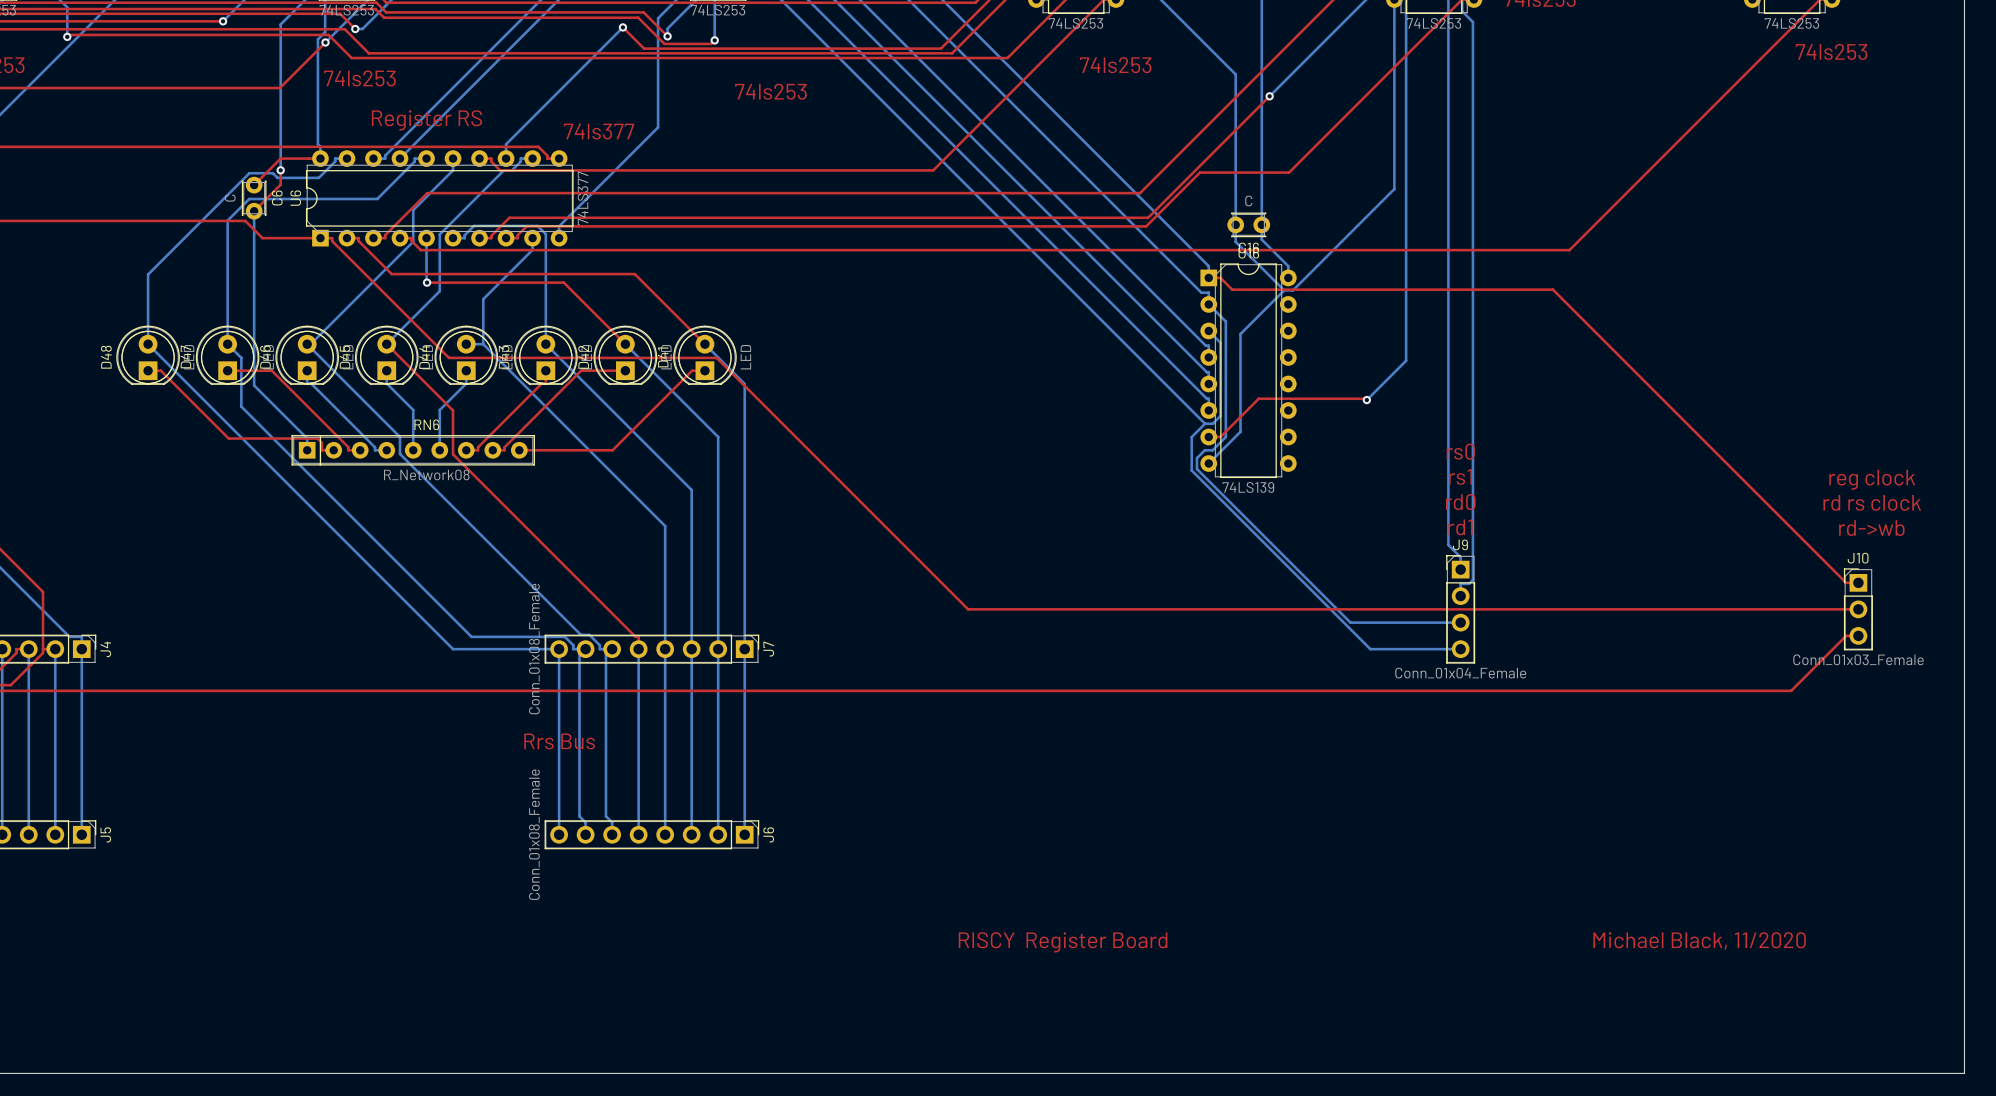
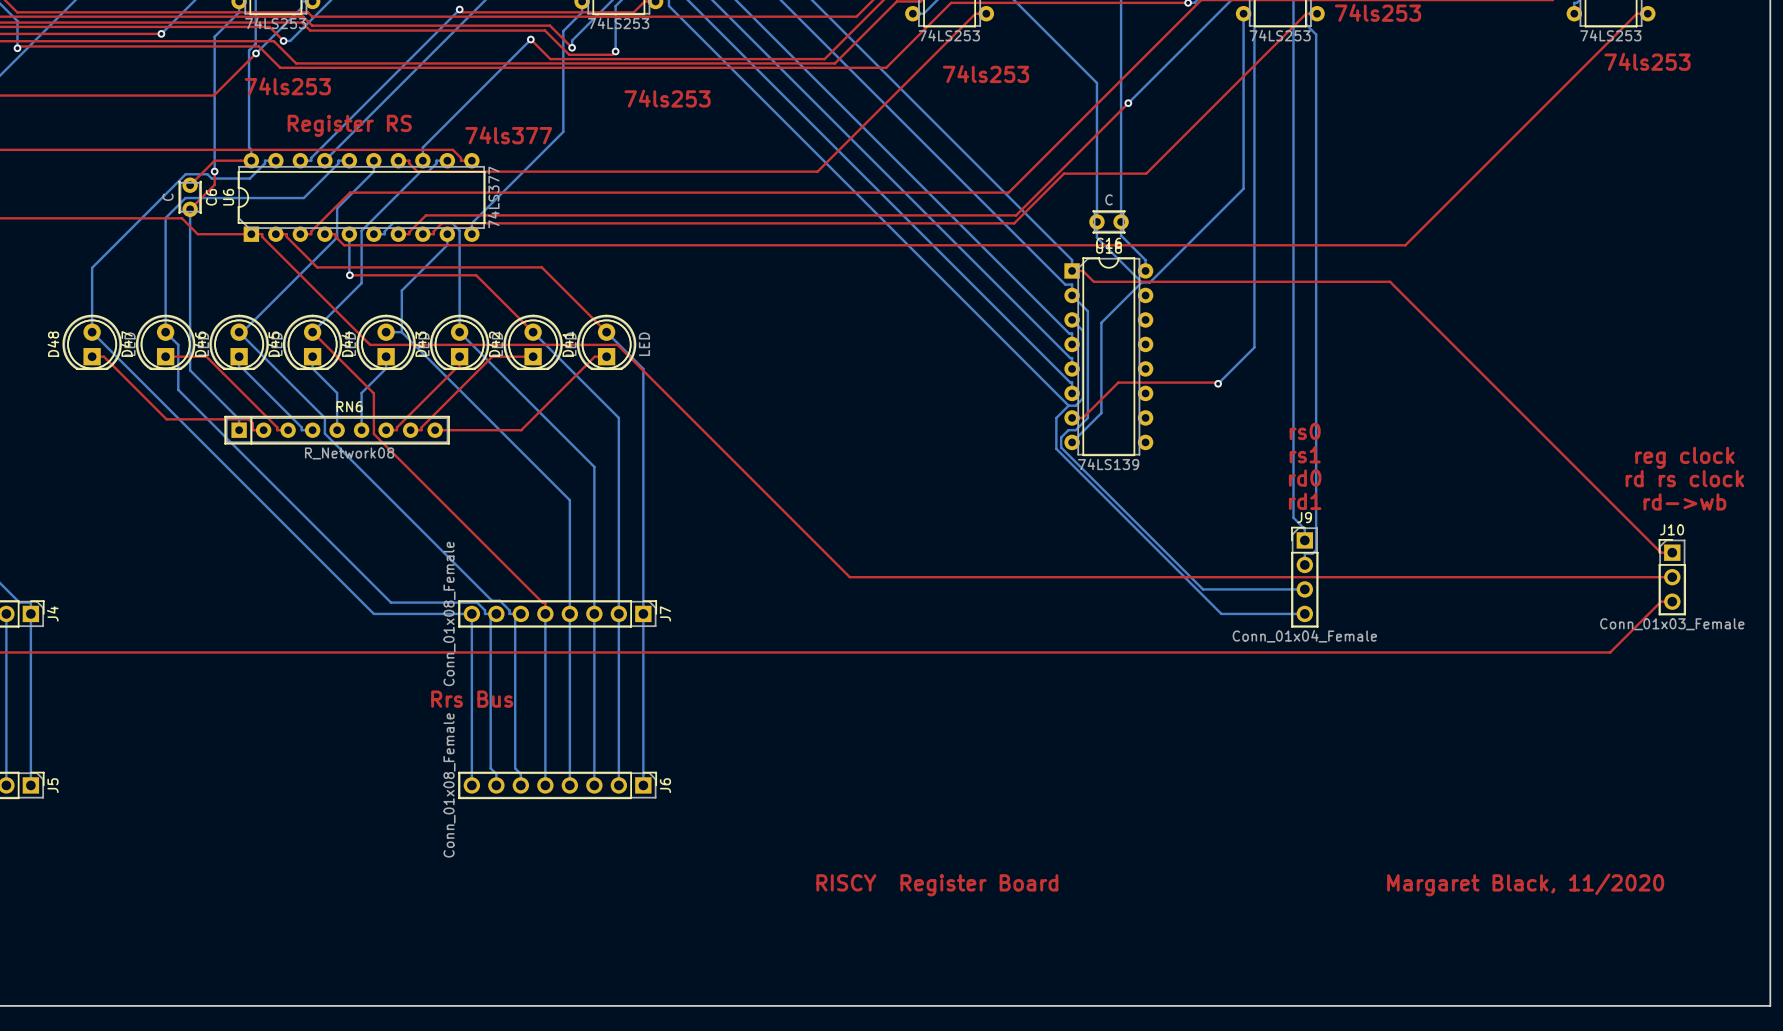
text: Michael Black, 11/2020 (1699, 941) -> Margaret Black, 11/2020 (1525, 884)

